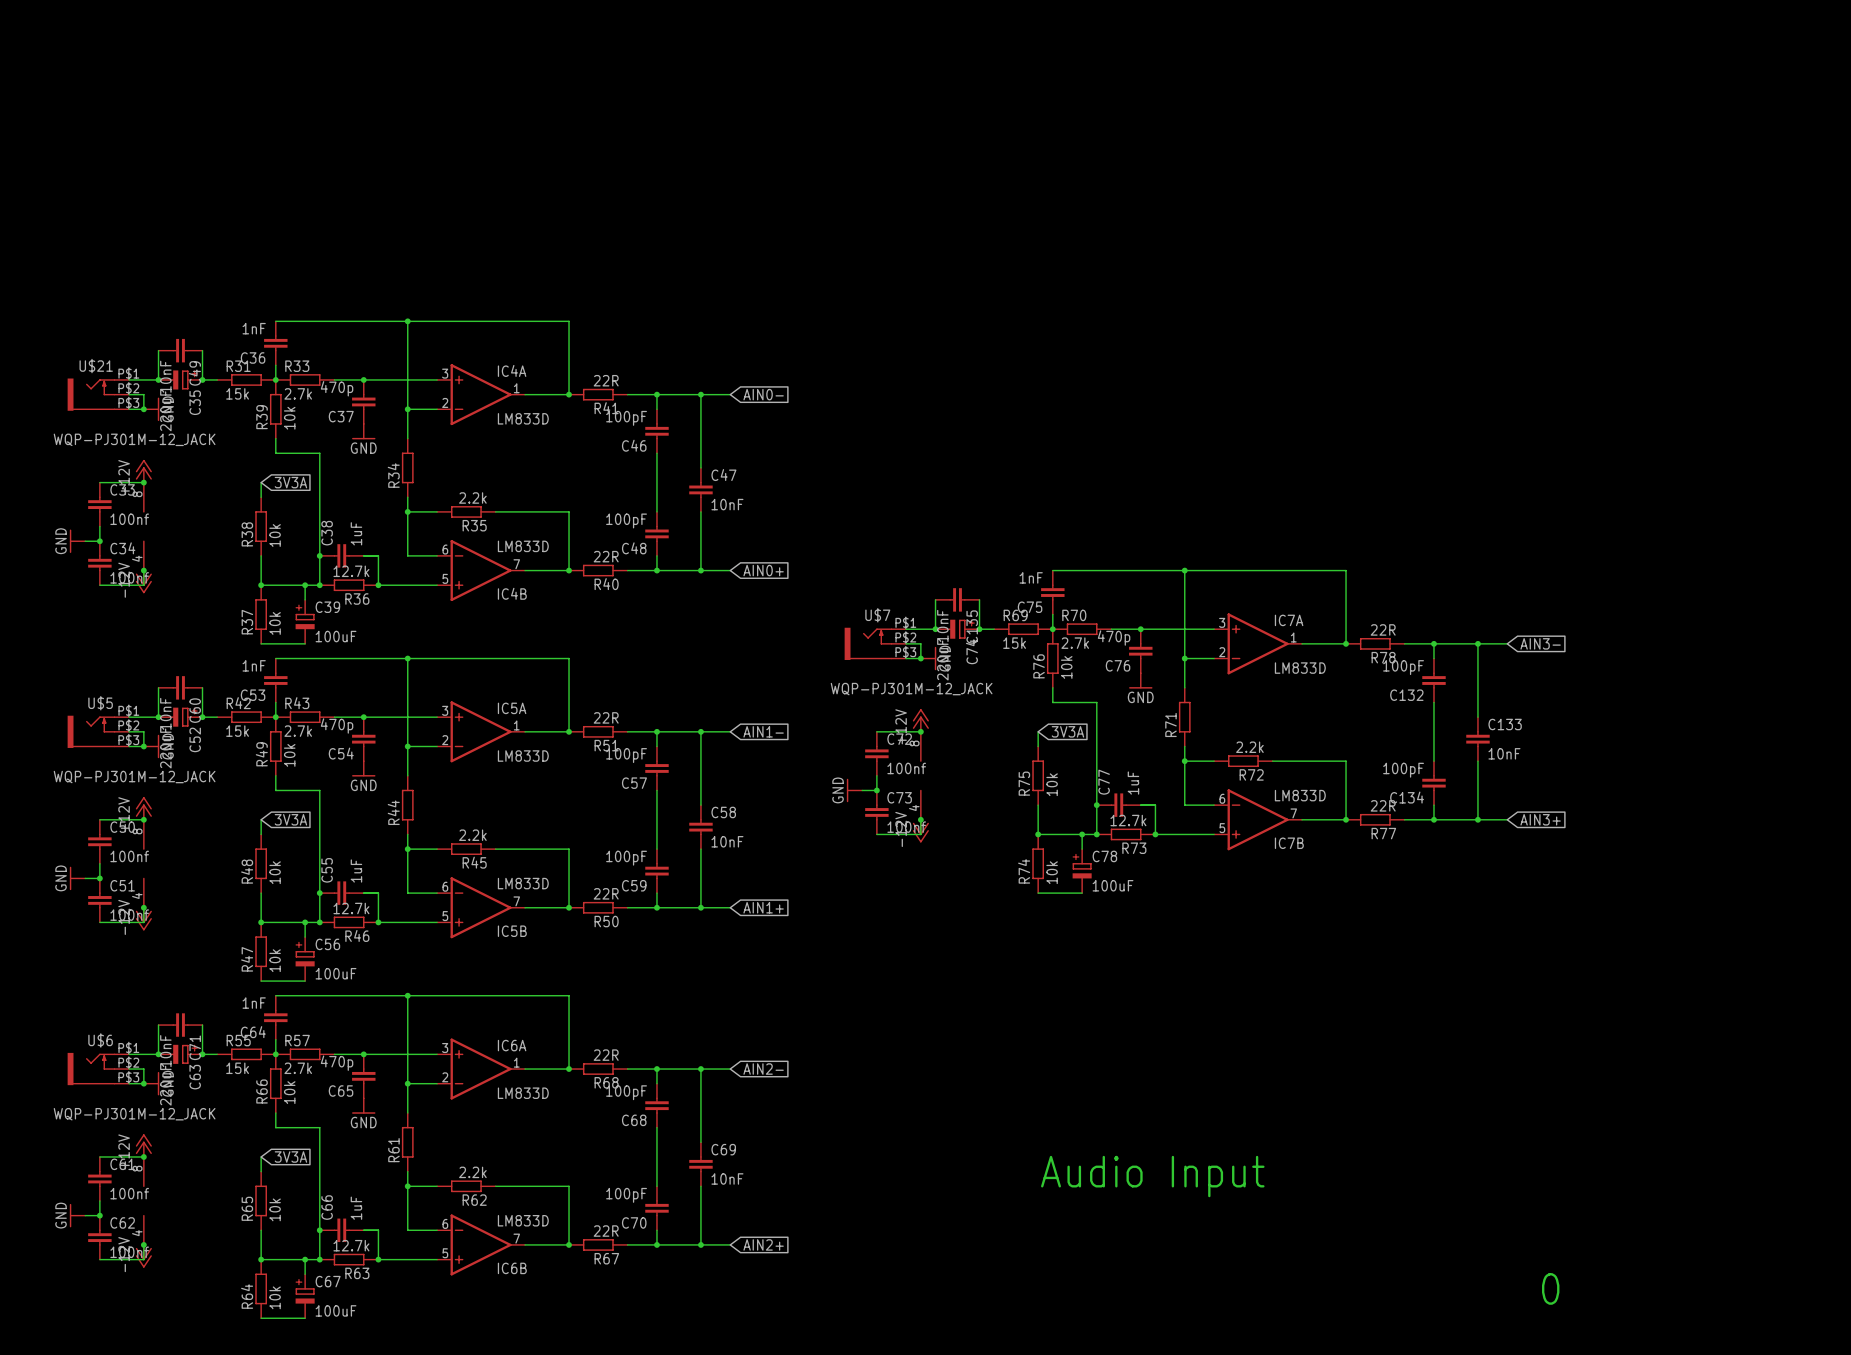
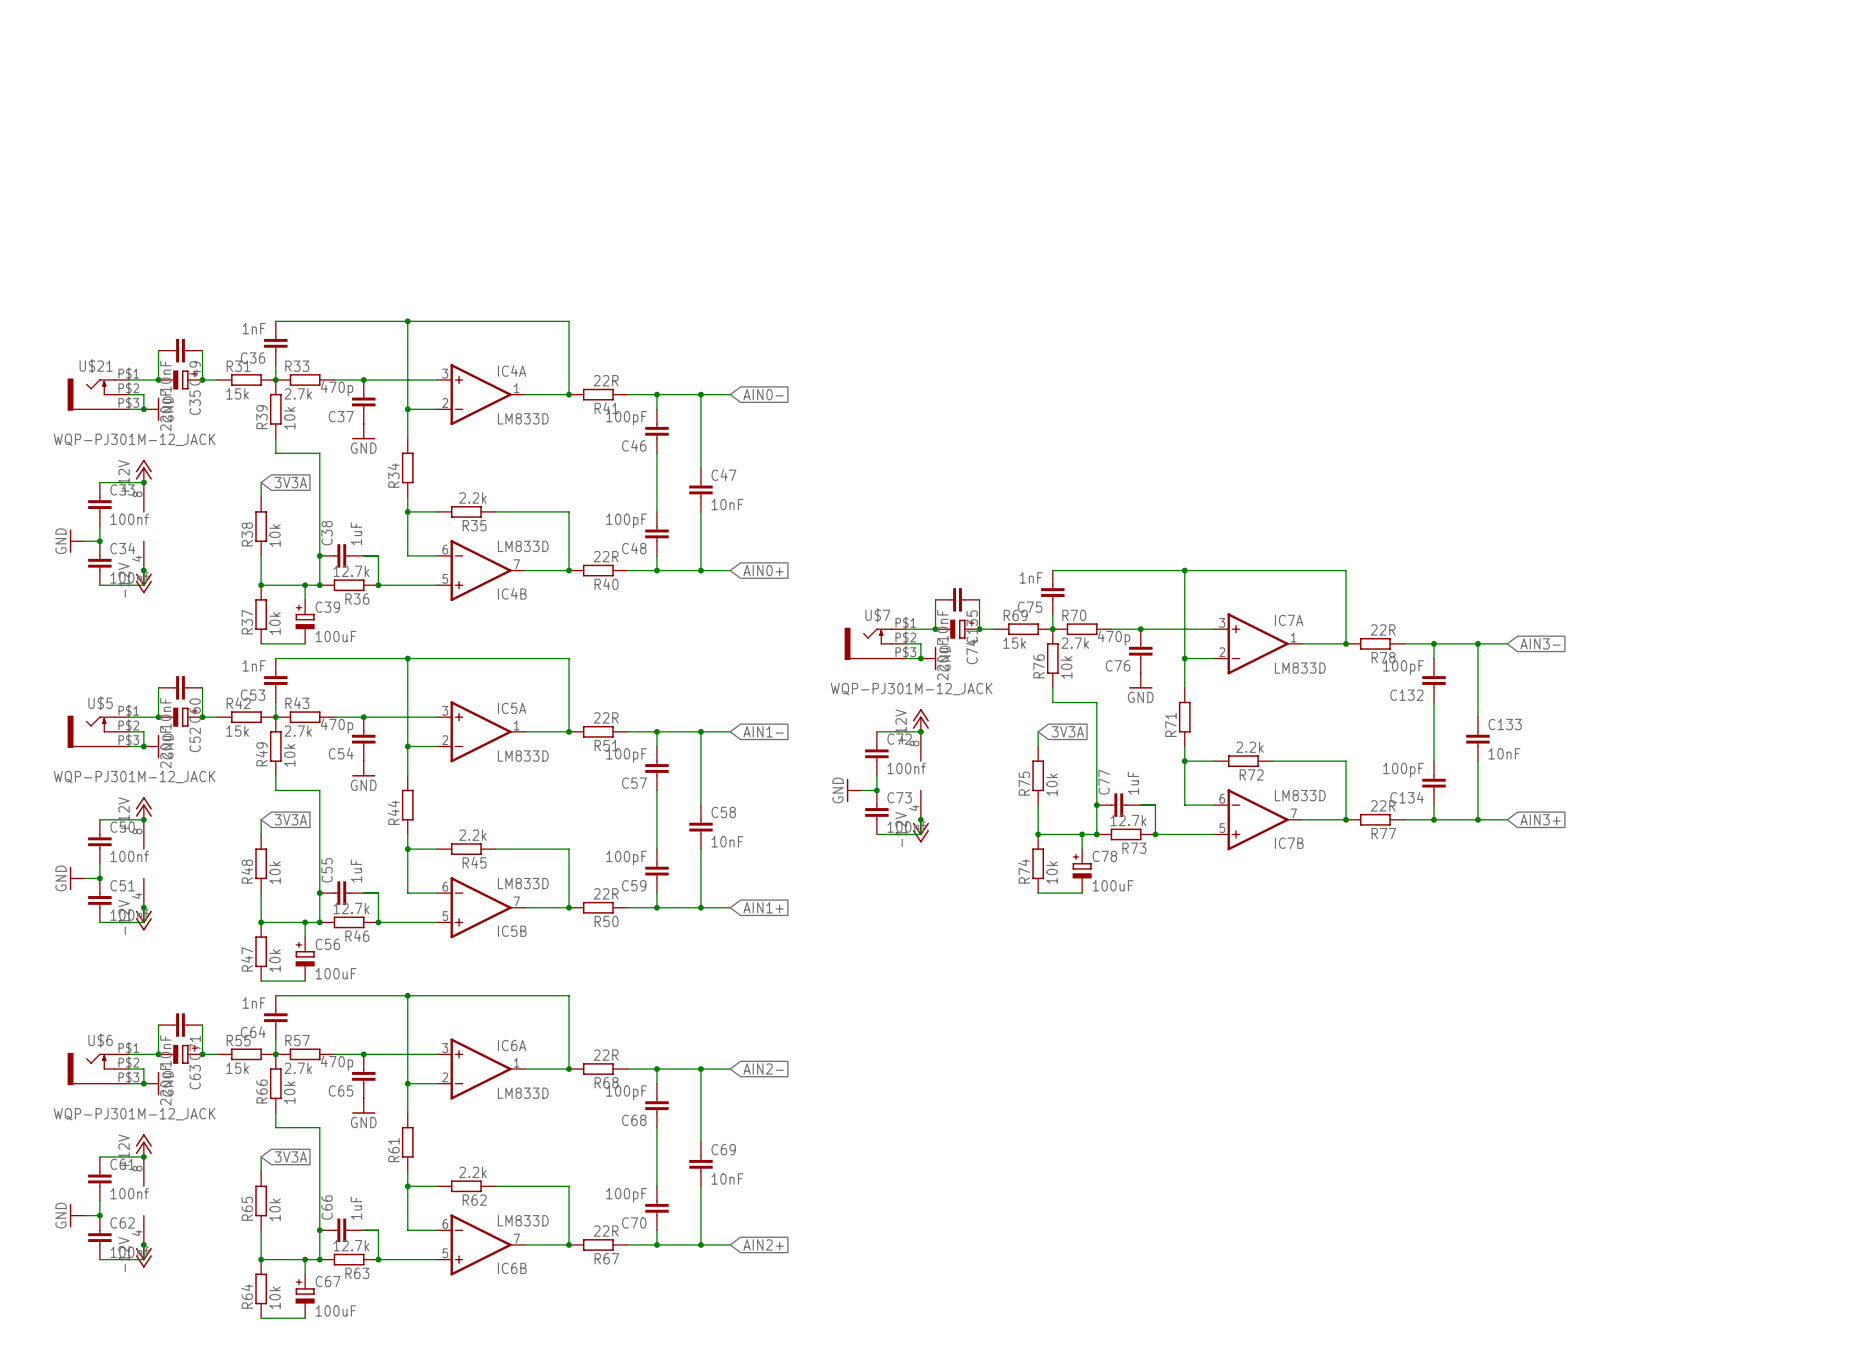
text: Audio Input (1152, 1176) -> none
text: 0 (1550, 1288) -> none

